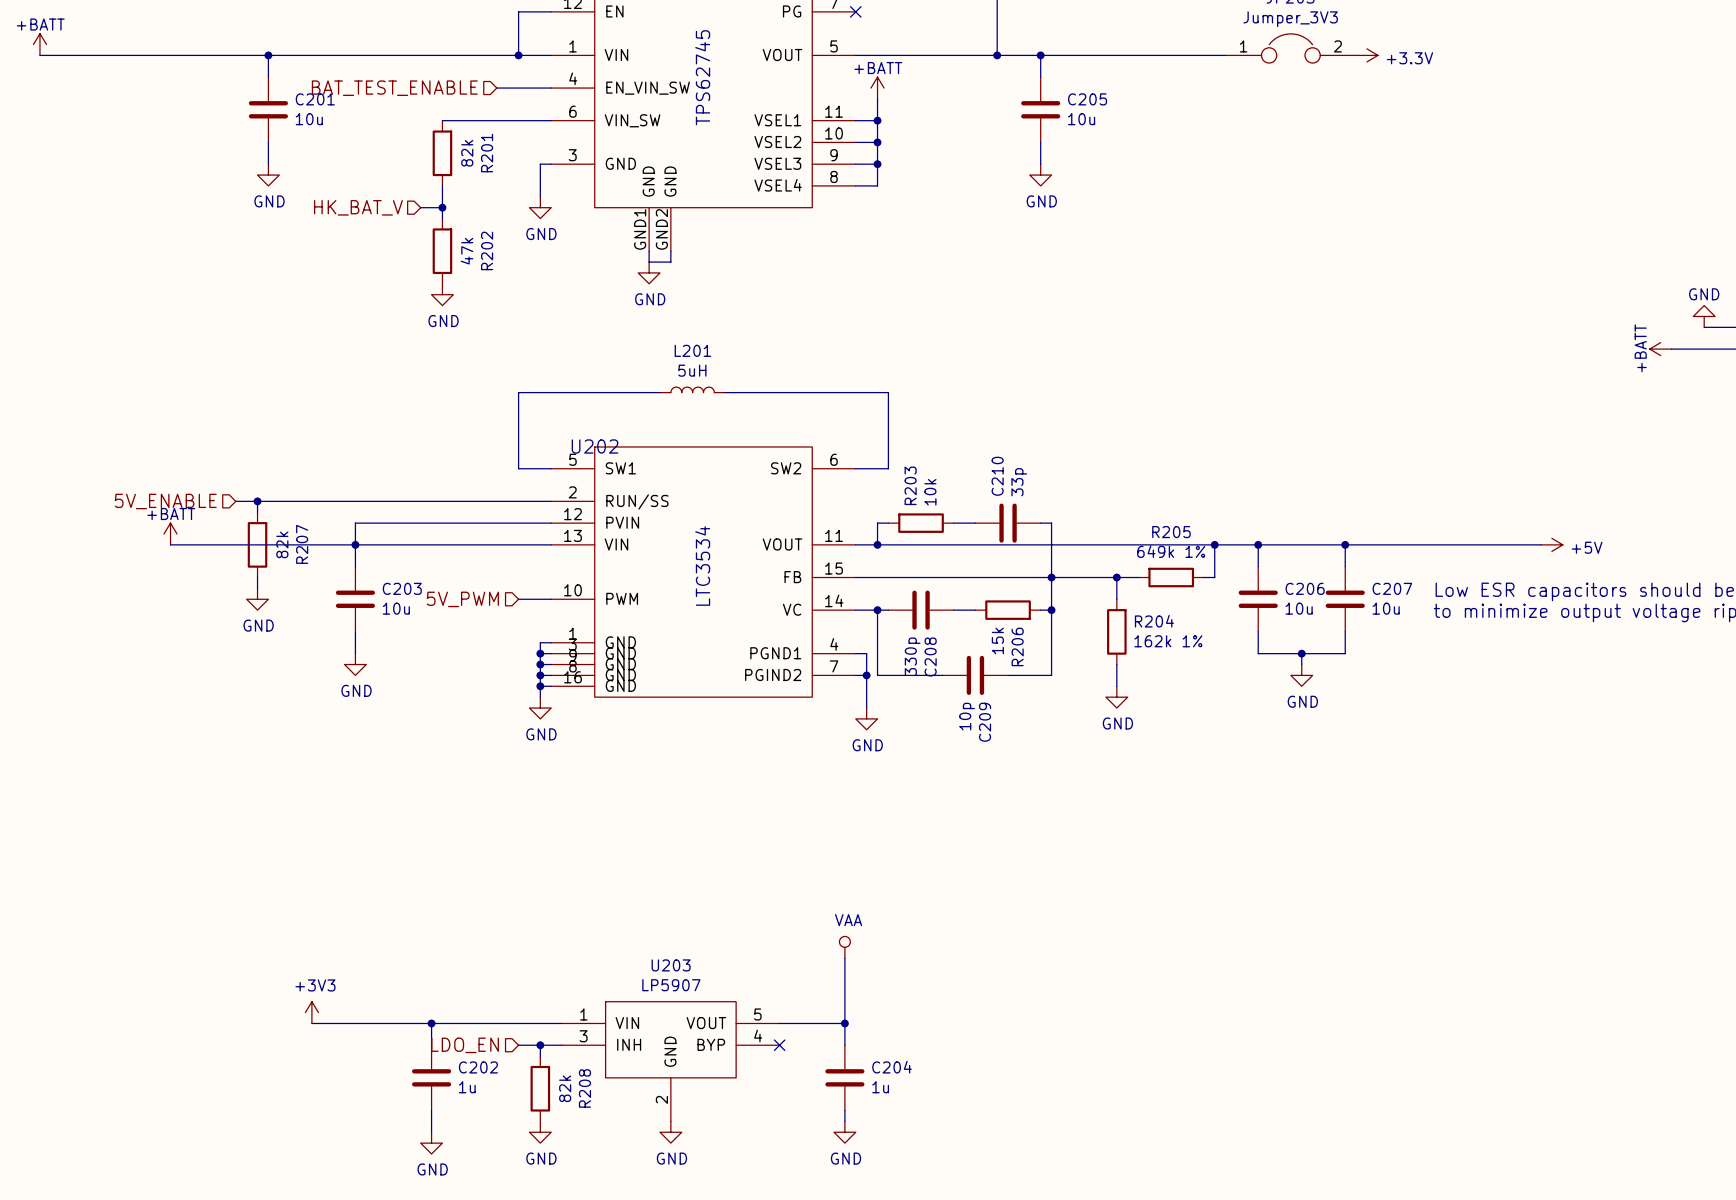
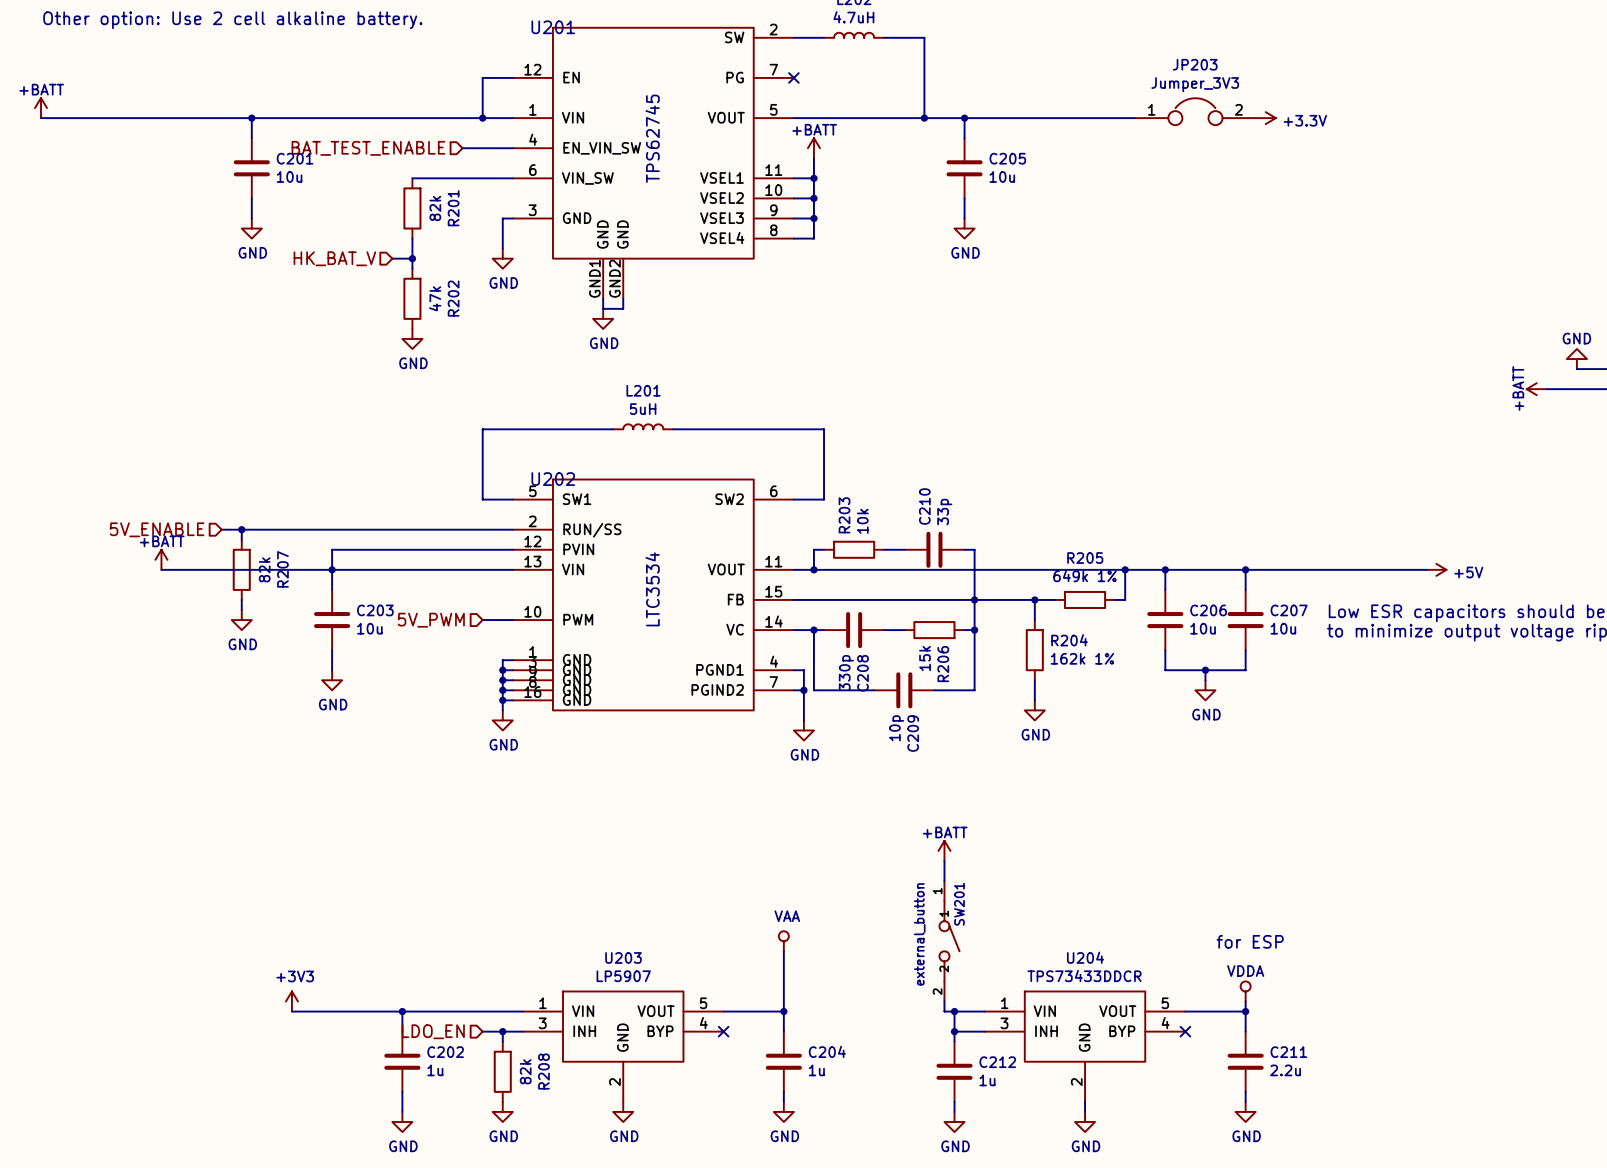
power symbol: none -> +BATT (944, 850)
wire: none -> (944, 860) (944, 881)
SW201: none -> external_button (949, 941)
text: none -> for ESP (1250, 941)
power symbol: none -> VDDA (1245, 991)
wire: none -> (944, 1001) (944, 1011) (984, 1011)
wire: none -> (1245, 1001) (1245, 1031)
wire: none -> (954, 1011) (954, 1041)
junction: none -> (954, 1011)
wire: none -> (1185, 1011) (1245, 1011)
junction: none -> (1245, 1011)
wire: none -> (954, 1031) (984, 1031)
junction: none -> (954, 1031)
no-connect mark: none -> (1185, 1031)
U204: none -> TPS73433DDCR (1085, 1046)
C211: none -> 2.2u (1245, 1061)
C212: none -> 1u (954, 1071)
wire: none -> (1245, 1091) (1245, 1101)
wire: none -> (954, 1101) (954, 1111)
wire: none -> (1085, 1101) (1085, 1111)
power symbol: none -> GND (1245, 1111)
power symbol: none -> GND (954, 1121)
power symbol: none -> GND (1085, 1121)

